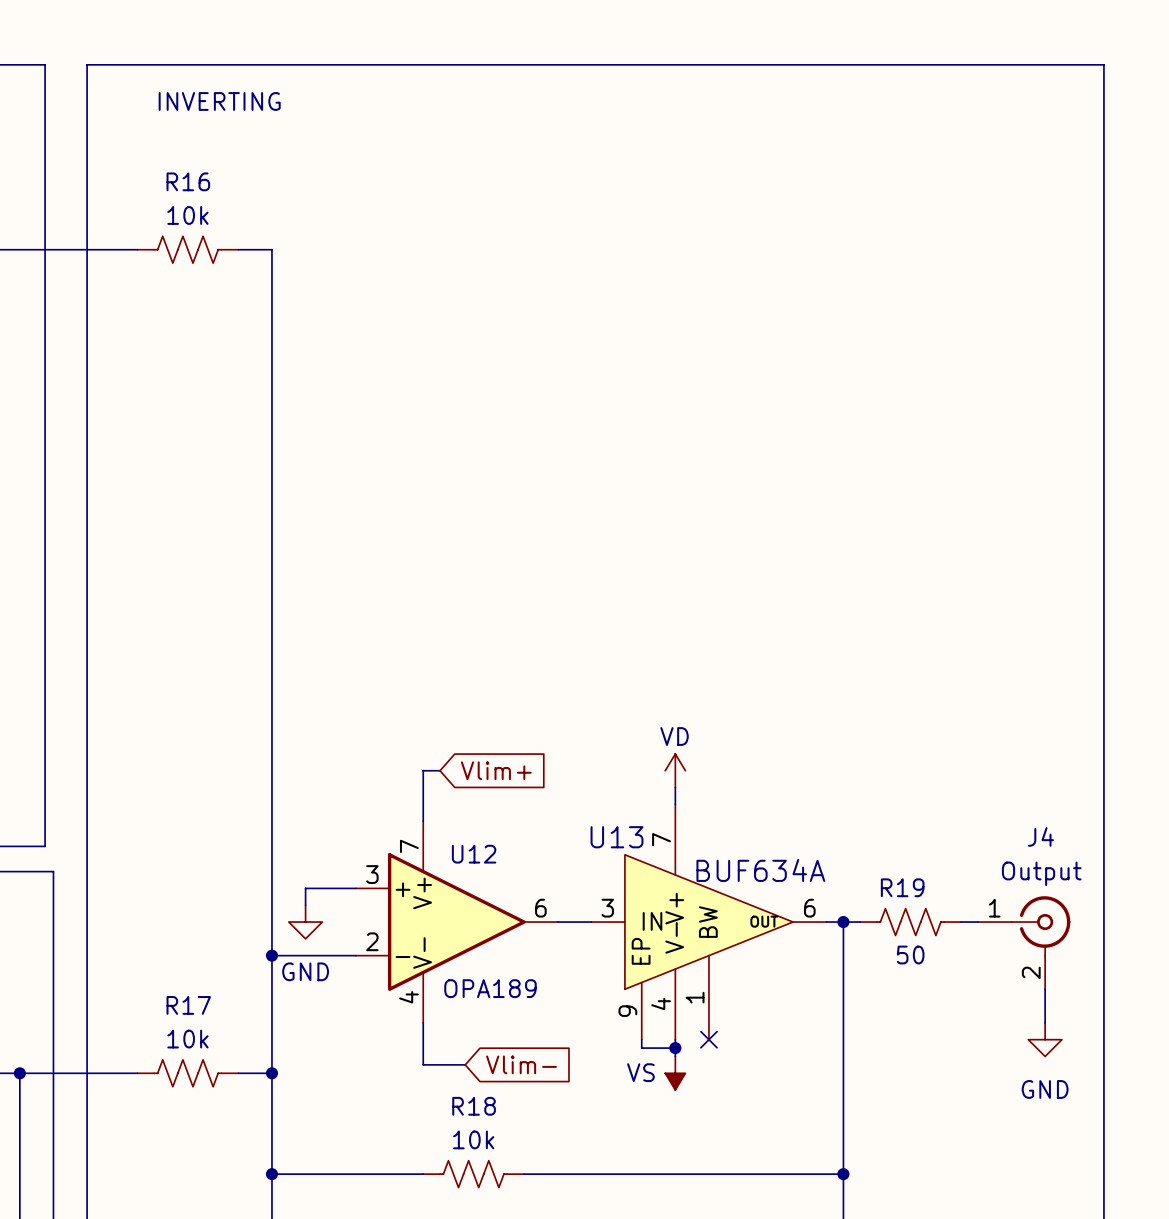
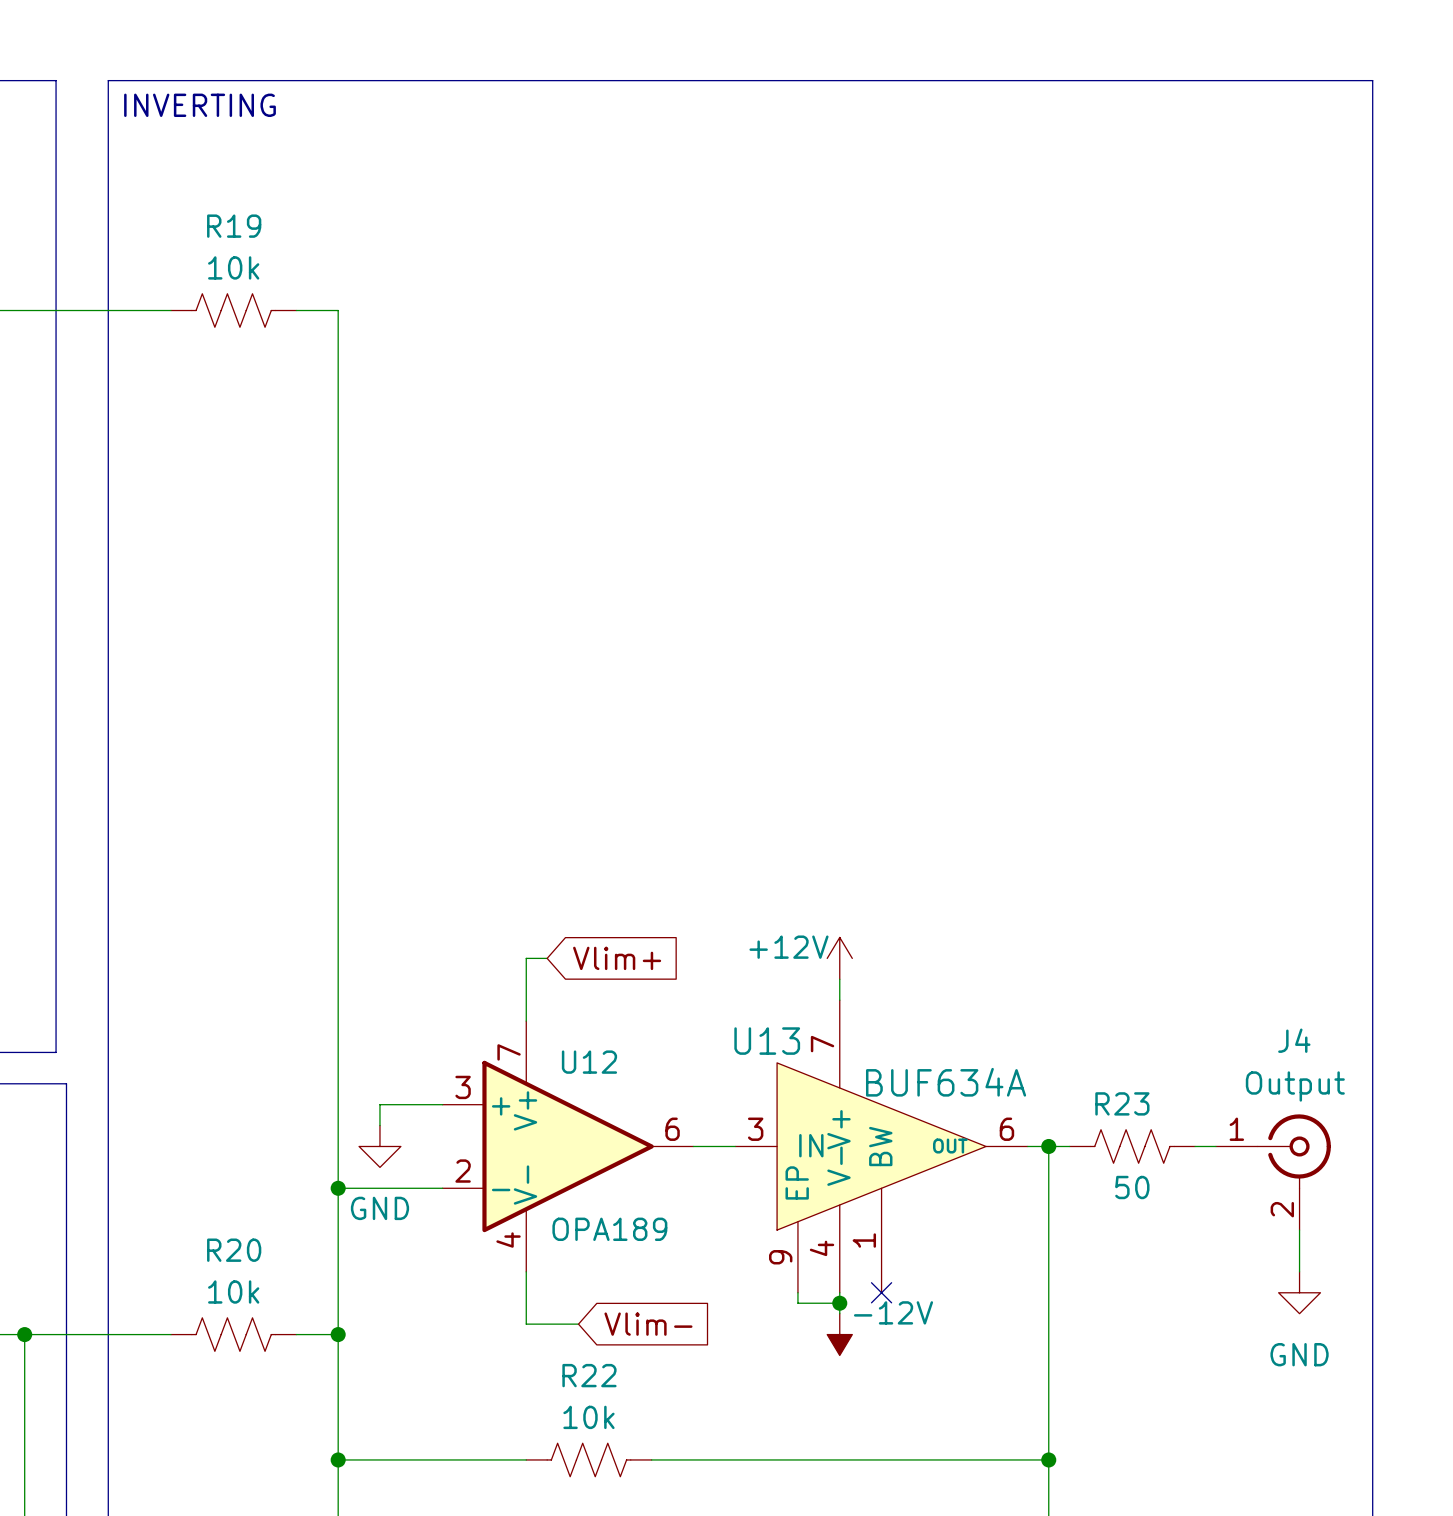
text position: INVERTING (219, 101) -> INVERTING (200, 105)
R16 name: R16 (188, 181) -> R19 (234, 226)
power symbol: VD (675, 770) -> +12V (839, 958)
R19 name: R19 (902, 887) -> R23 (1122, 1103)
R17 name: R17 (188, 1005) -> R20 (234, 1250)
power symbol: VS (675, 1073) -> -12V (839, 1334)
R18 name: R18 (474, 1106) -> R22 (589, 1375)

